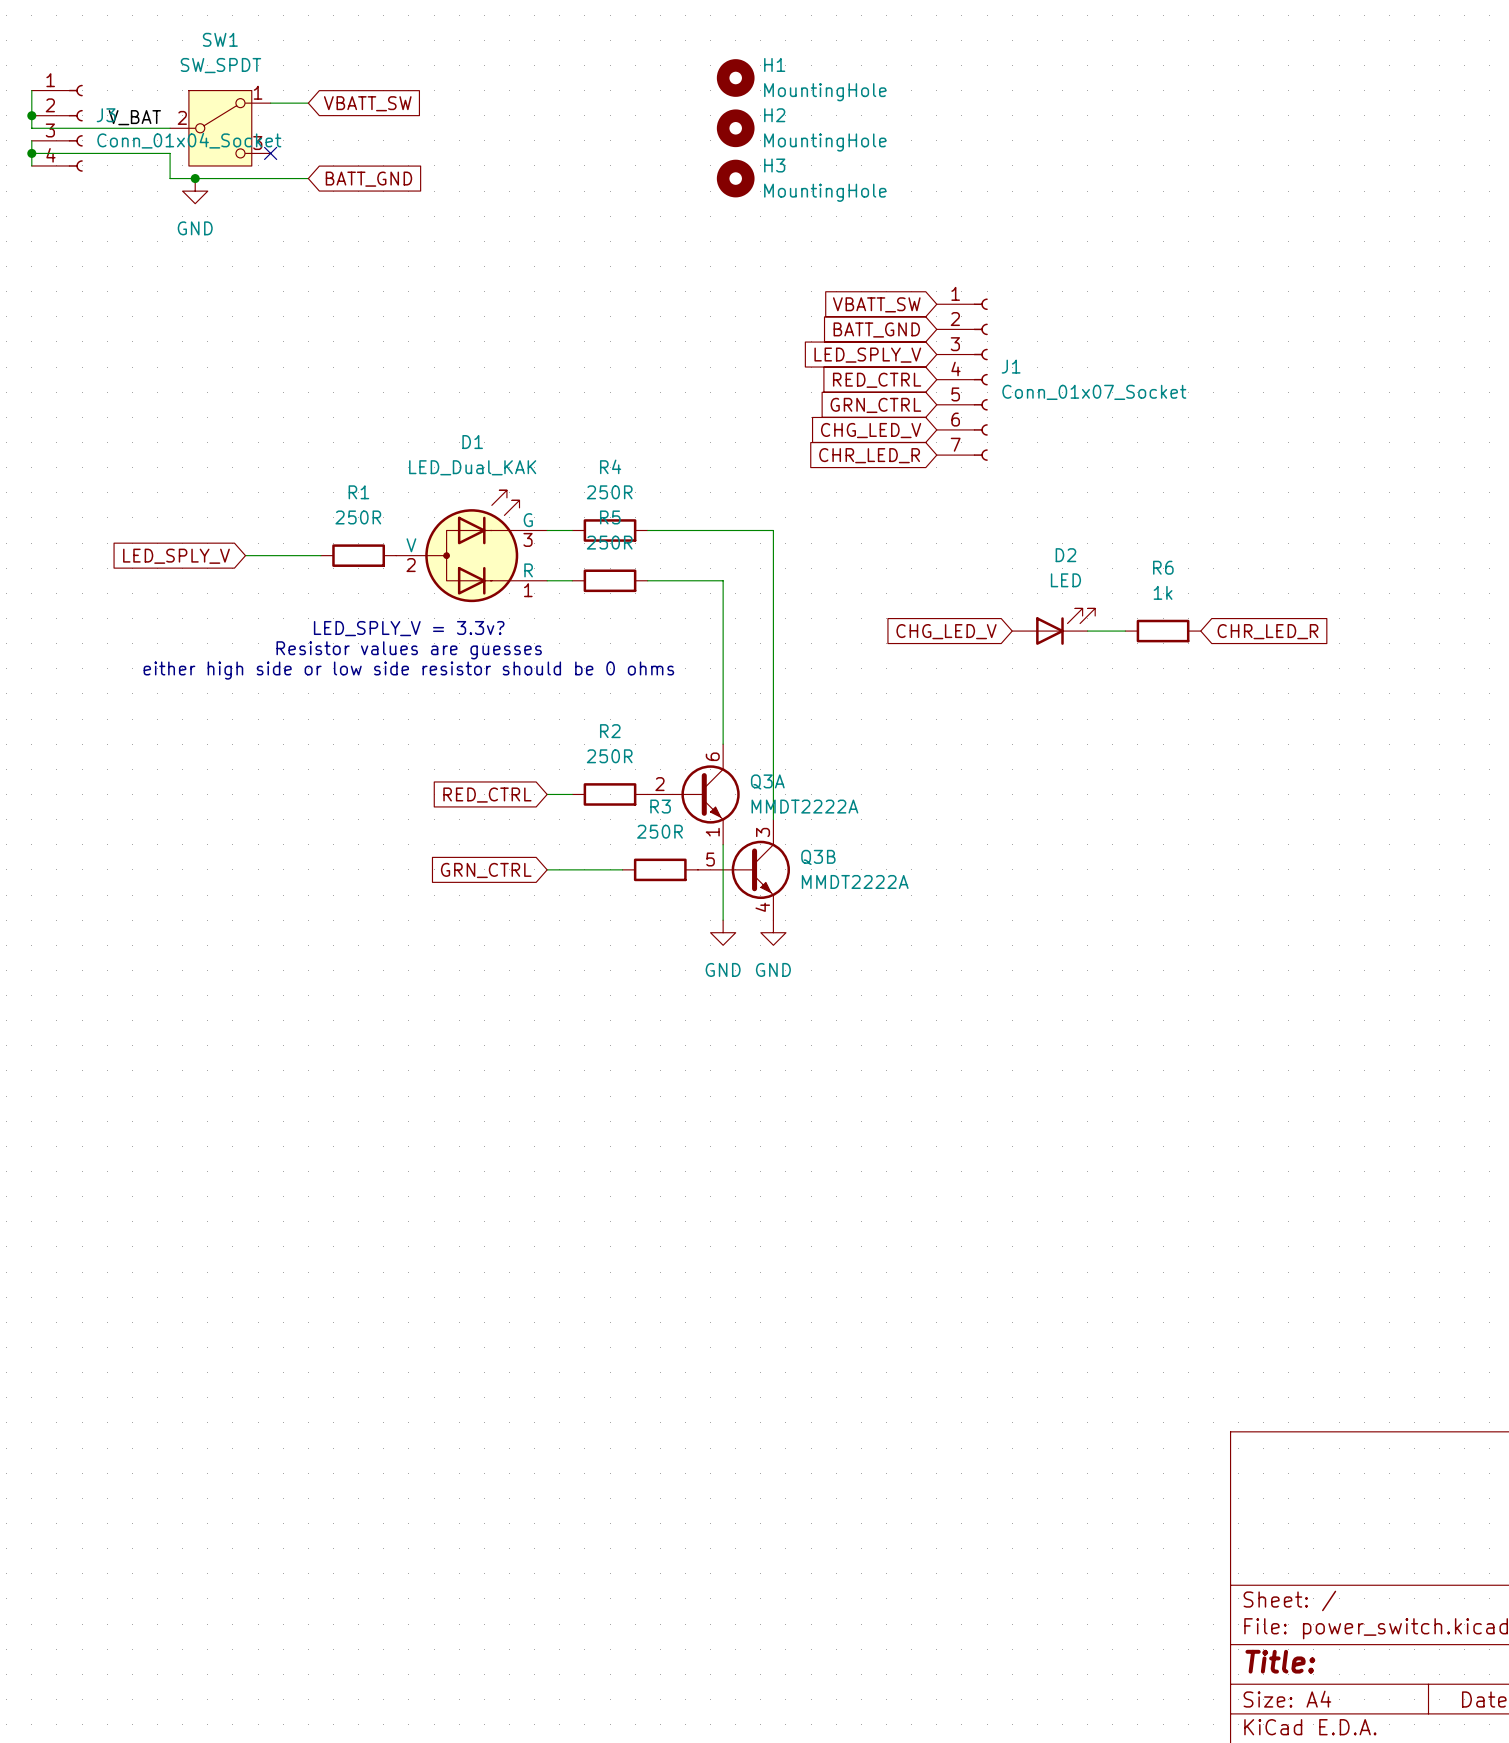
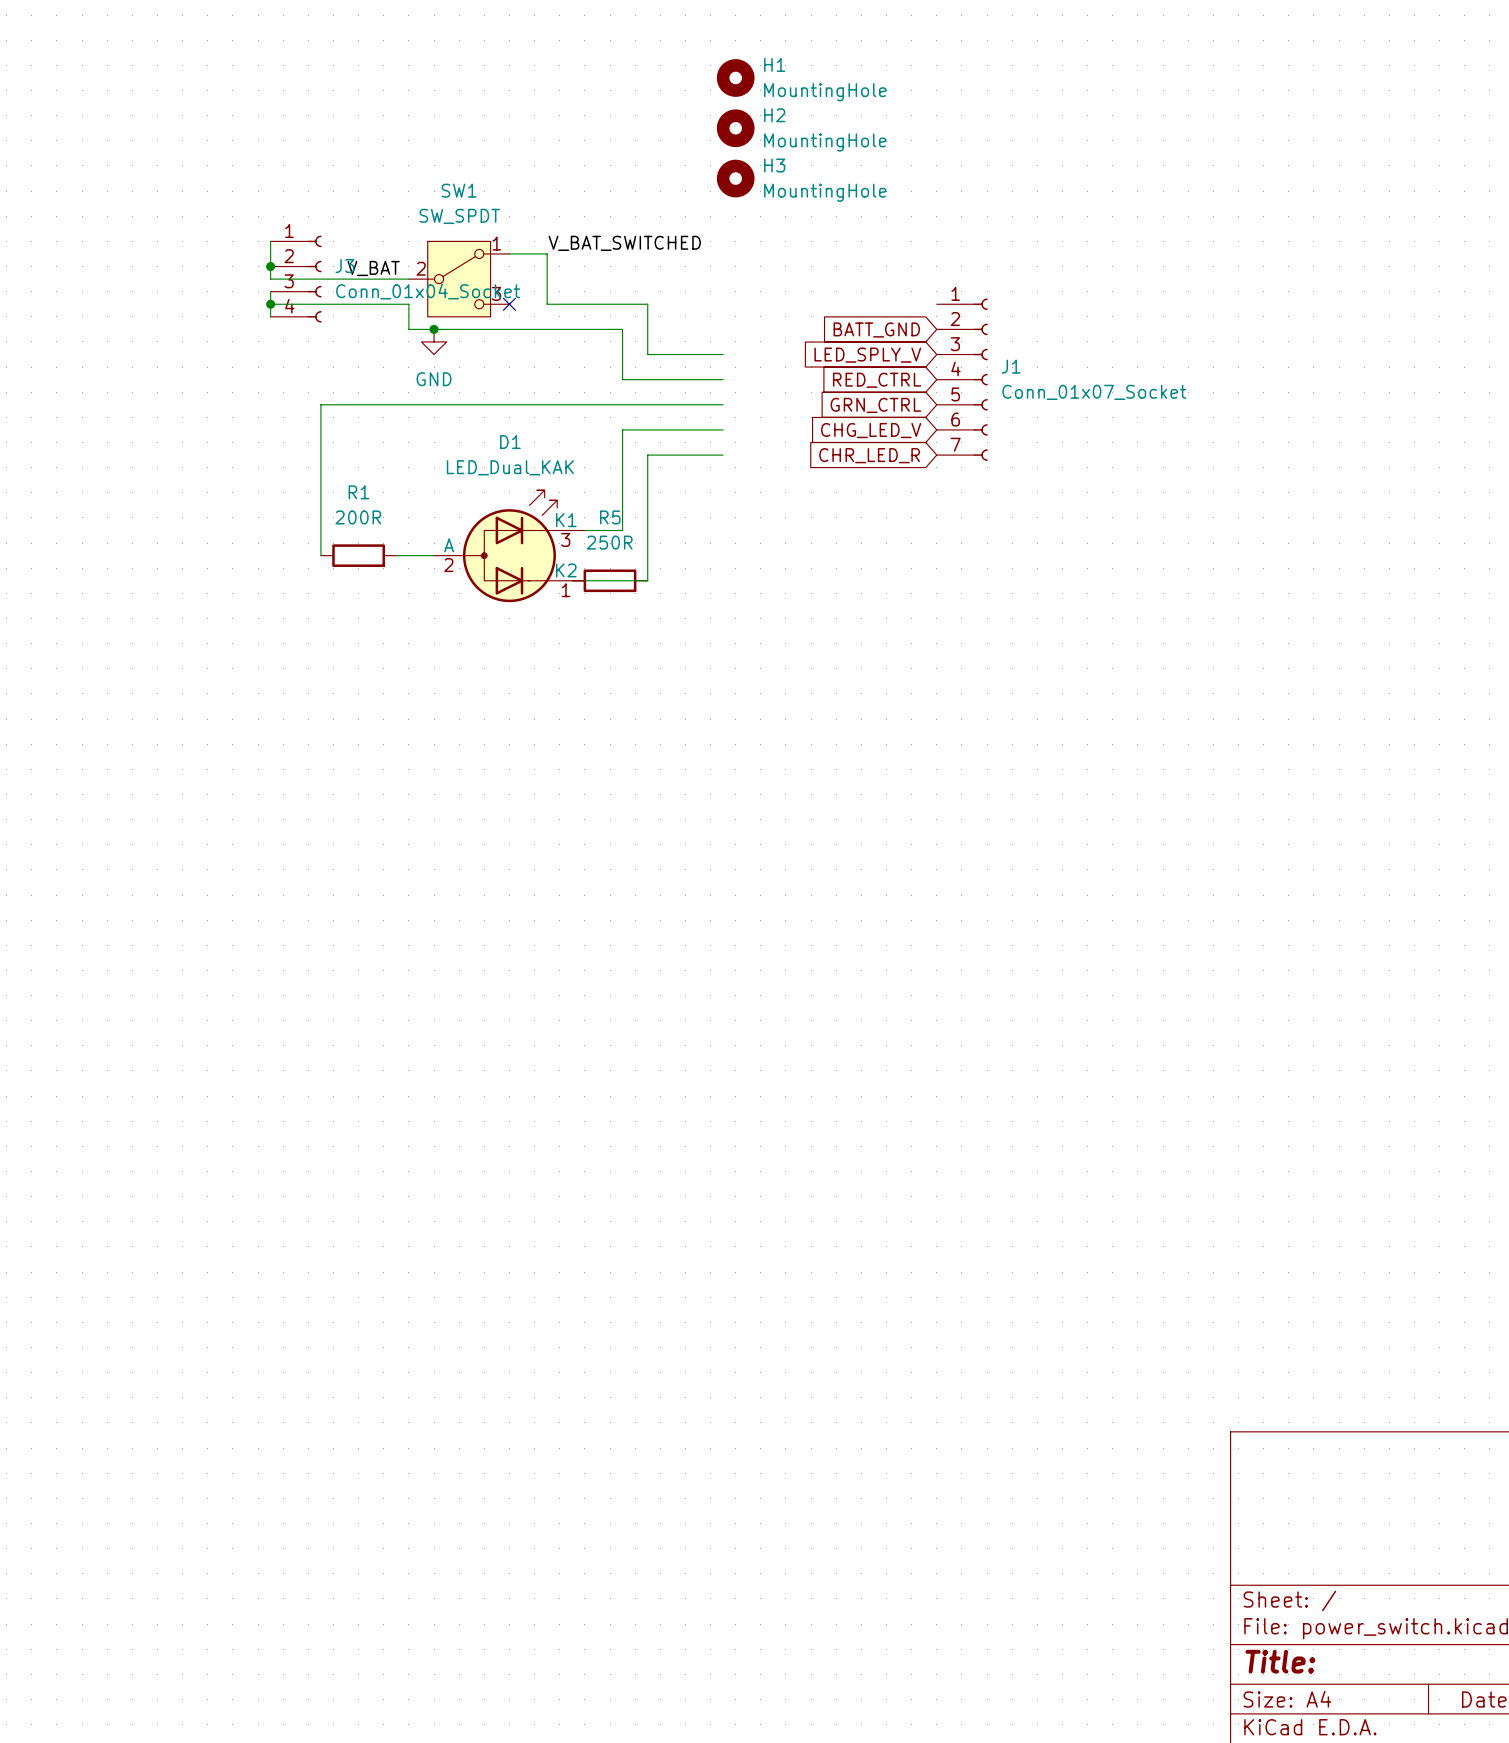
wire: (31, 90) (31, 128) (170, 128) -> none
wire: (270, 103) (308, 103) -> none
global label: VBATT_SW (367, 103) -> none
junction: (31, 115) -> none
label: V_BAT (134, 117) -> none
J3 position: (57, 128) -> (296, 279)
SW1 position: (220, 128) -> (459, 279)
wire: (31, 140) (31, 165) -> none
wire: (31, 153) (170, 153) (170, 178) (308, 178) -> none
junction: (31, 153) -> none
no-connect mark: (270, 153) -> none
junction: (195, 178) -> none
global label: BATT_GND (368, 179) -> none
power symbol: GND (195, 191) -> none
wire: none -> (270, 241) (270, 279) (408, 279)
label: none -> V_BAT_SWITCHED (624, 243)
wire: none -> (509, 253) (547, 253) (547, 304) (647, 304) (647, 354) (723, 354)
junction: none -> (270, 266)
label: none -> V_BAT (373, 268)
wire: none -> (270, 291) (270, 316)
wire: none -> (270, 304) (408, 304) (408, 329) (622, 329) (622, 379) (723, 379)
junction: none -> (270, 304)
no-connect mark: none -> (509, 304)
global label: VBATT_SW (876, 304) -> none
junction: none -> (434, 329)
power symbol: none -> GND (434, 341)
wire: none -> (723, 429) (622, 429) (622, 530) (584, 530)
wire: none -> (723, 455) (647, 455) (647, 580) (584, 580)
R1 value: 250R (358, 517) -> 200R (358, 517)
D1 pin name: G (528, 520) -> K1 (566, 520)
R4: 250R (610, 530) -> none
wire: (647, 530) (773, 530) (773, 819) -> none
D1 pin name: V (411, 545) -> A (449, 545)
D1 position: (471, 546) -> (509, 546)
wire: (245, 555) (320, 555) -> (723, 404) (320, 404) (320, 555)
global label: LED_SPLY_V (176, 556) -> none
D1 pin name: R (528, 570) -> K2 (566, 570)
wire: (647, 580) (723, 580) (723, 744) -> none
D2: LED (1053, 626) -> none
text: LED_SPLY_V = 3.3v? (409, 628) -> none
global label: CHG_LED_V (946, 631) -> none
wire: (1087, 631) (1125, 631) -> none
R6: 1k (1163, 631) -> none
global label: CHR_LED_R (1267, 631) -> none
text: Resistor values are guesses (409, 650) -> none
text: either high side or low side resistor should be 0 ohms (408, 670) -> none
wire: (547, 794) (572, 794) -> none
R2: 250R (610, 794) -> none
Q3A: MMDT2222A (693, 794) -> none
global label: RED_CTRL (487, 795) -> none
wire: (723, 844) (723, 920) -> none
wire: (547, 869) (622, 869) -> none
R3: 250R (660, 869) -> none
Q3B: MMDT2222A (743, 869) -> none
global label: GRN_CTRL (486, 870) -> none
power symbol: GND (723, 932) -> none
power symbol: GND (773, 932) -> none

